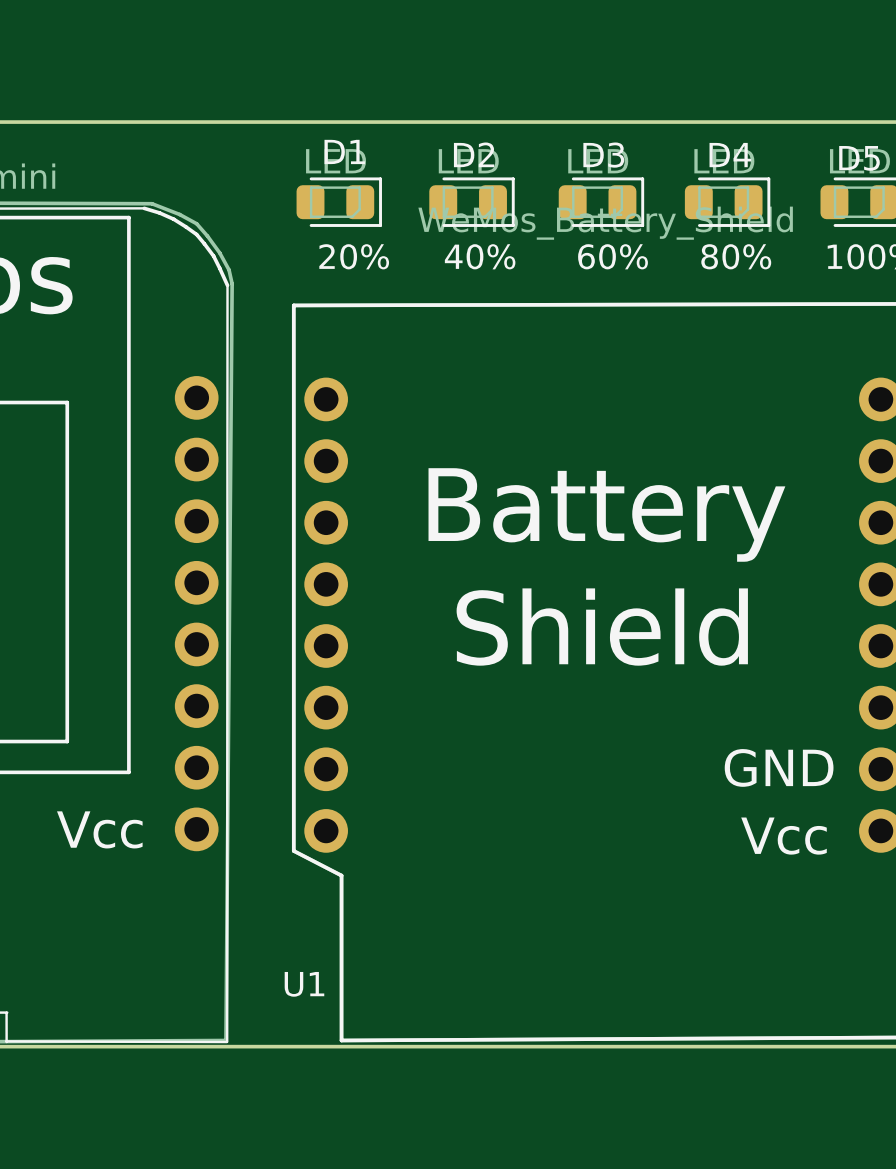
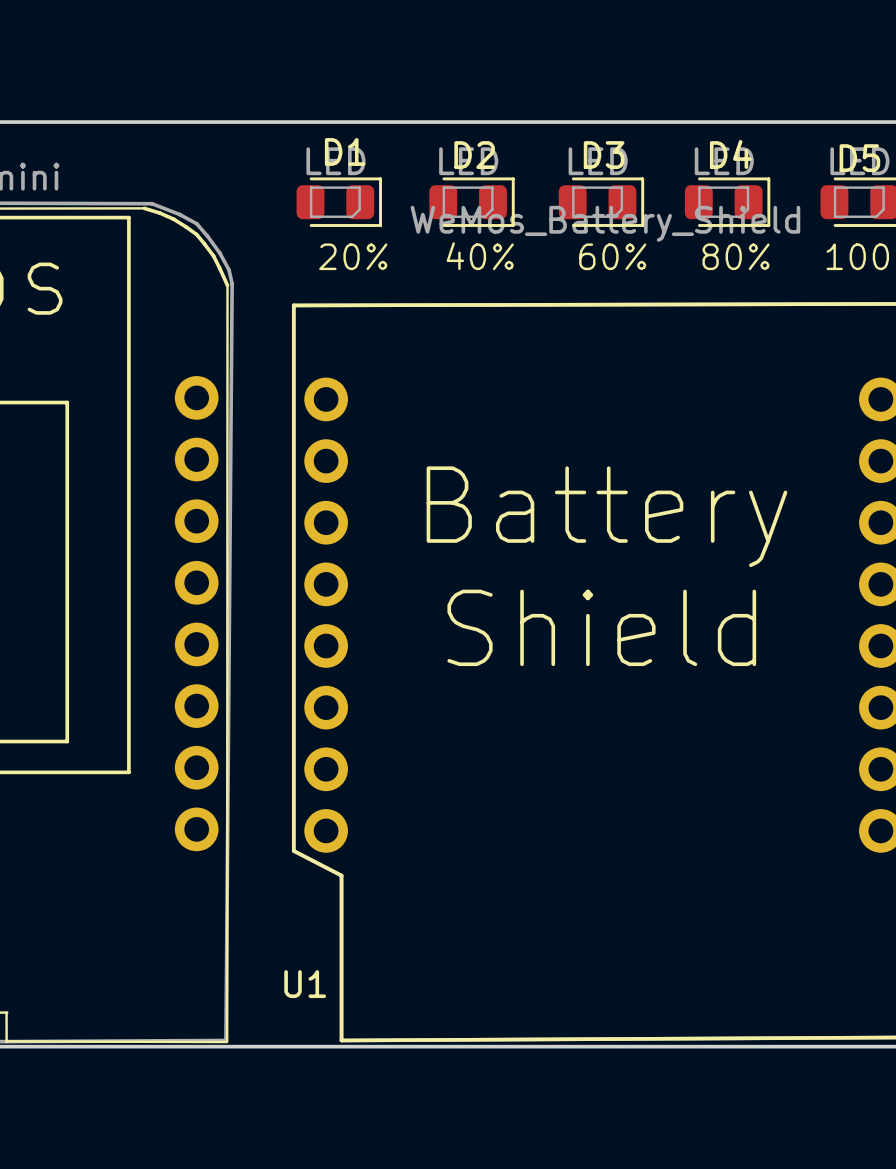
text: GND (779, 767) -> none
text: Vcc (99, 829) -> none
text: Vcc (783, 836) -> none

